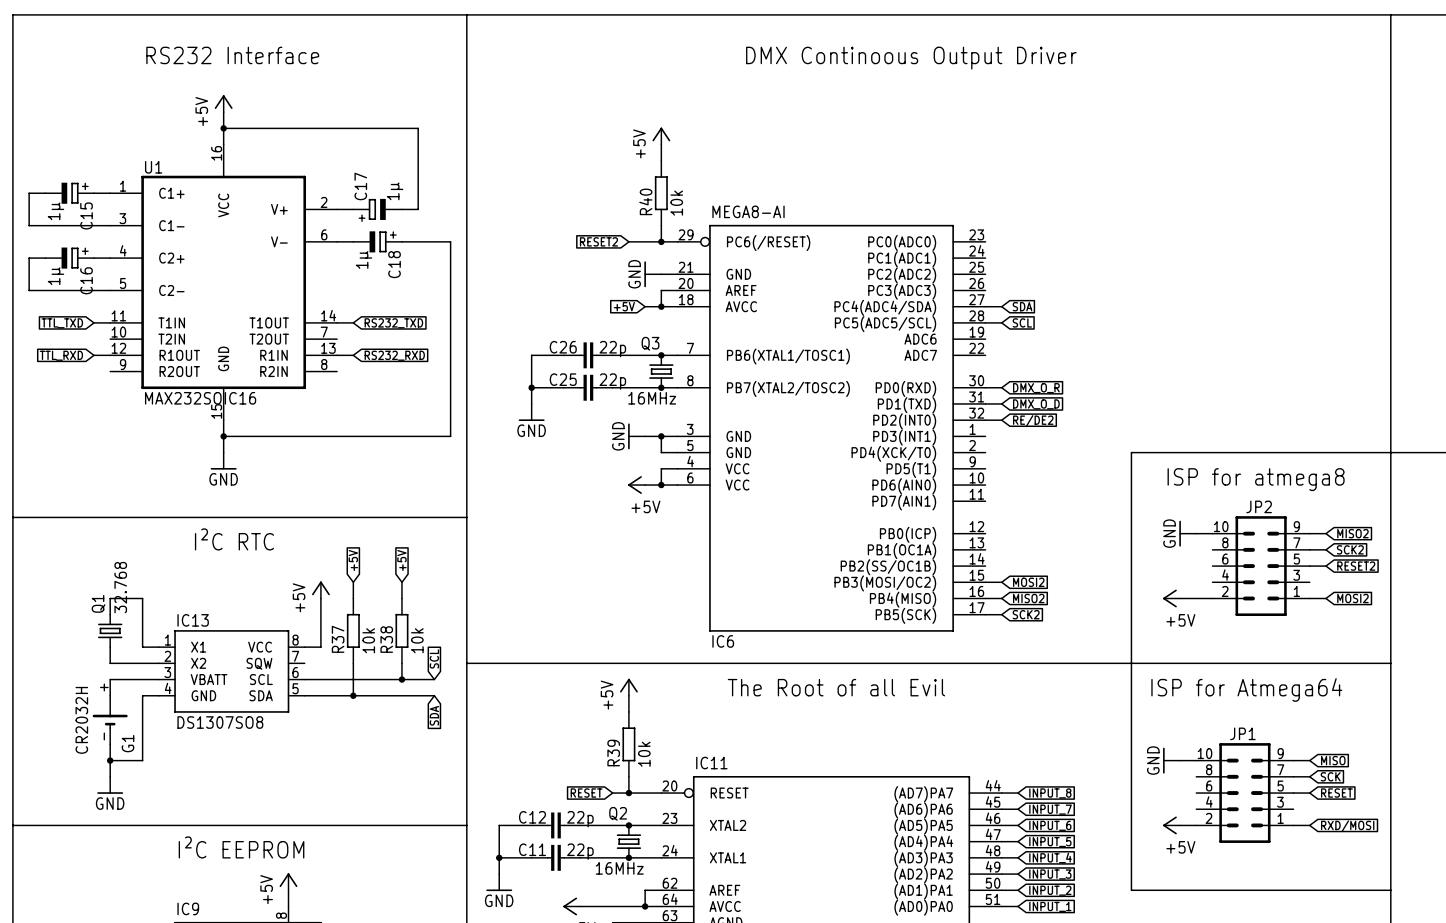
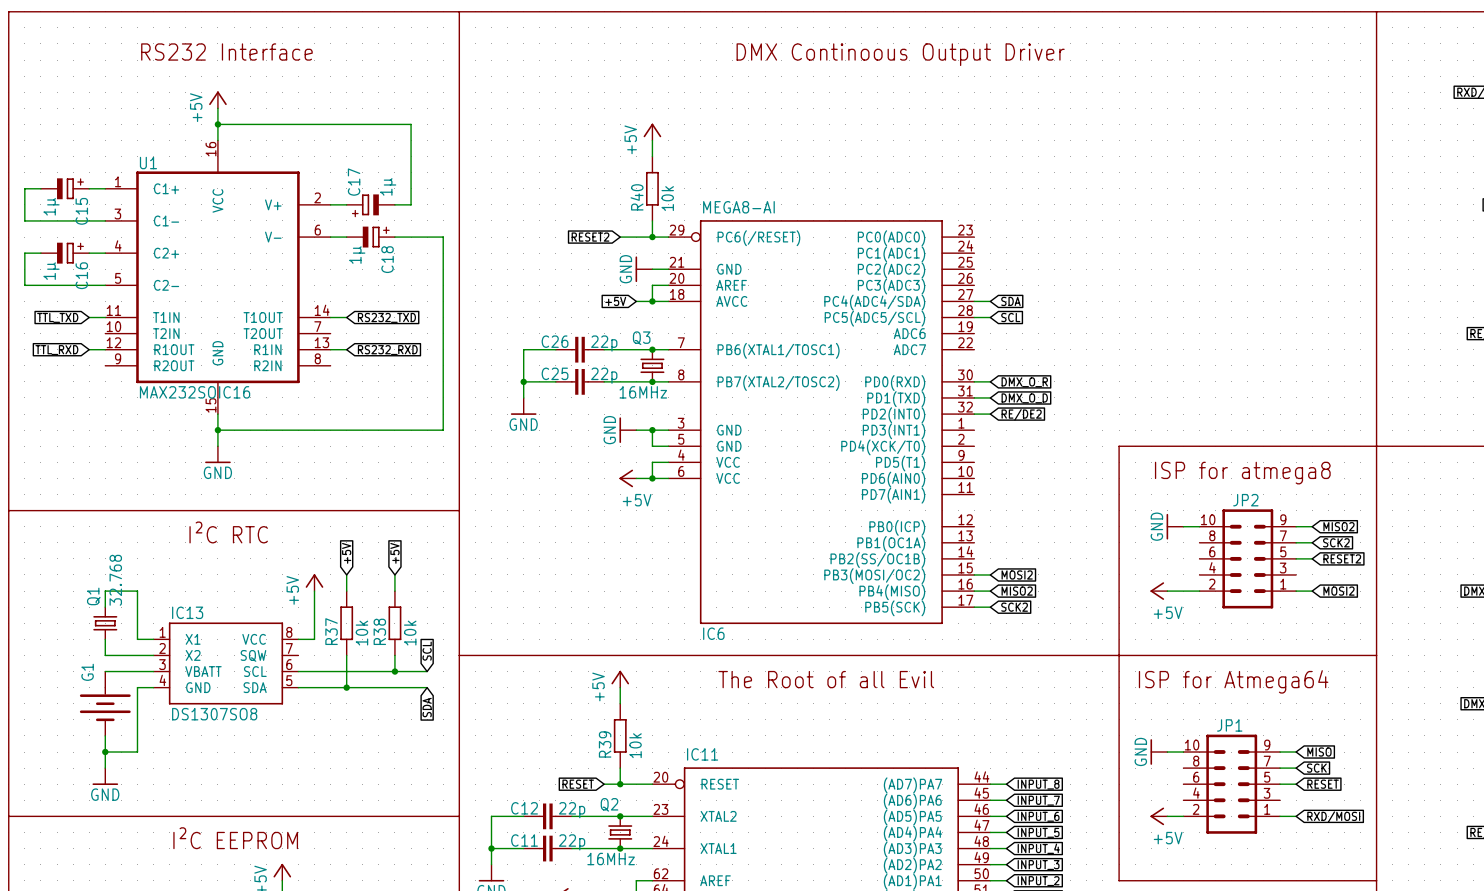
G1 symbol: [92, 679, 128, 745] -> [79, 671, 131, 736]
G1 value: CR2032H (81, 720) -> none
G1 name position: G1 (128, 743) -> G1 (87, 672)

